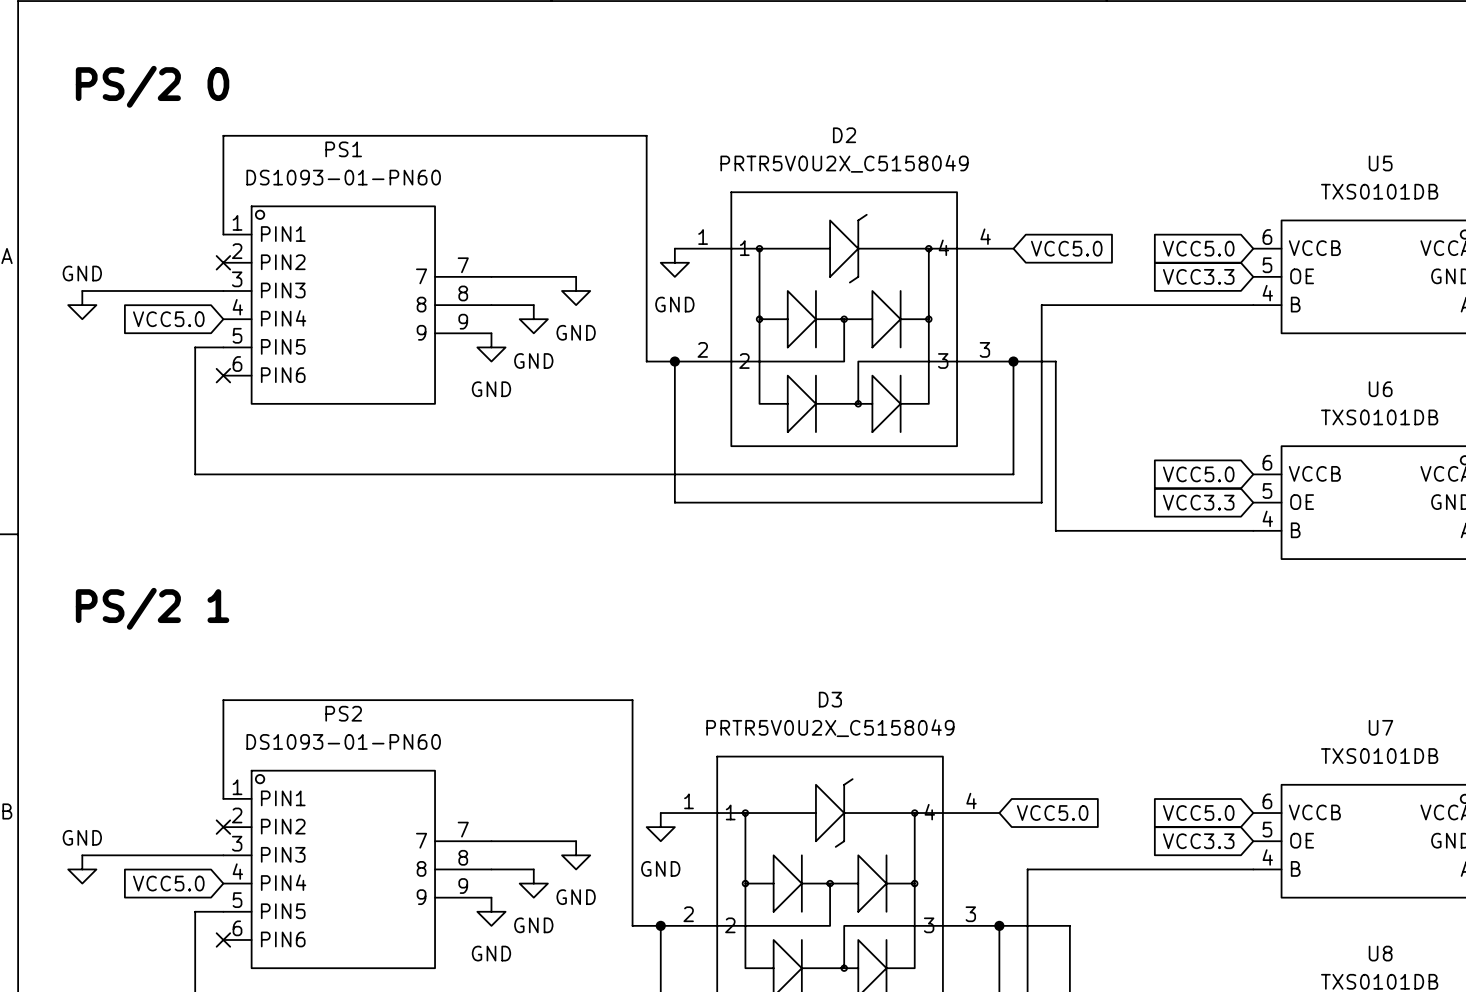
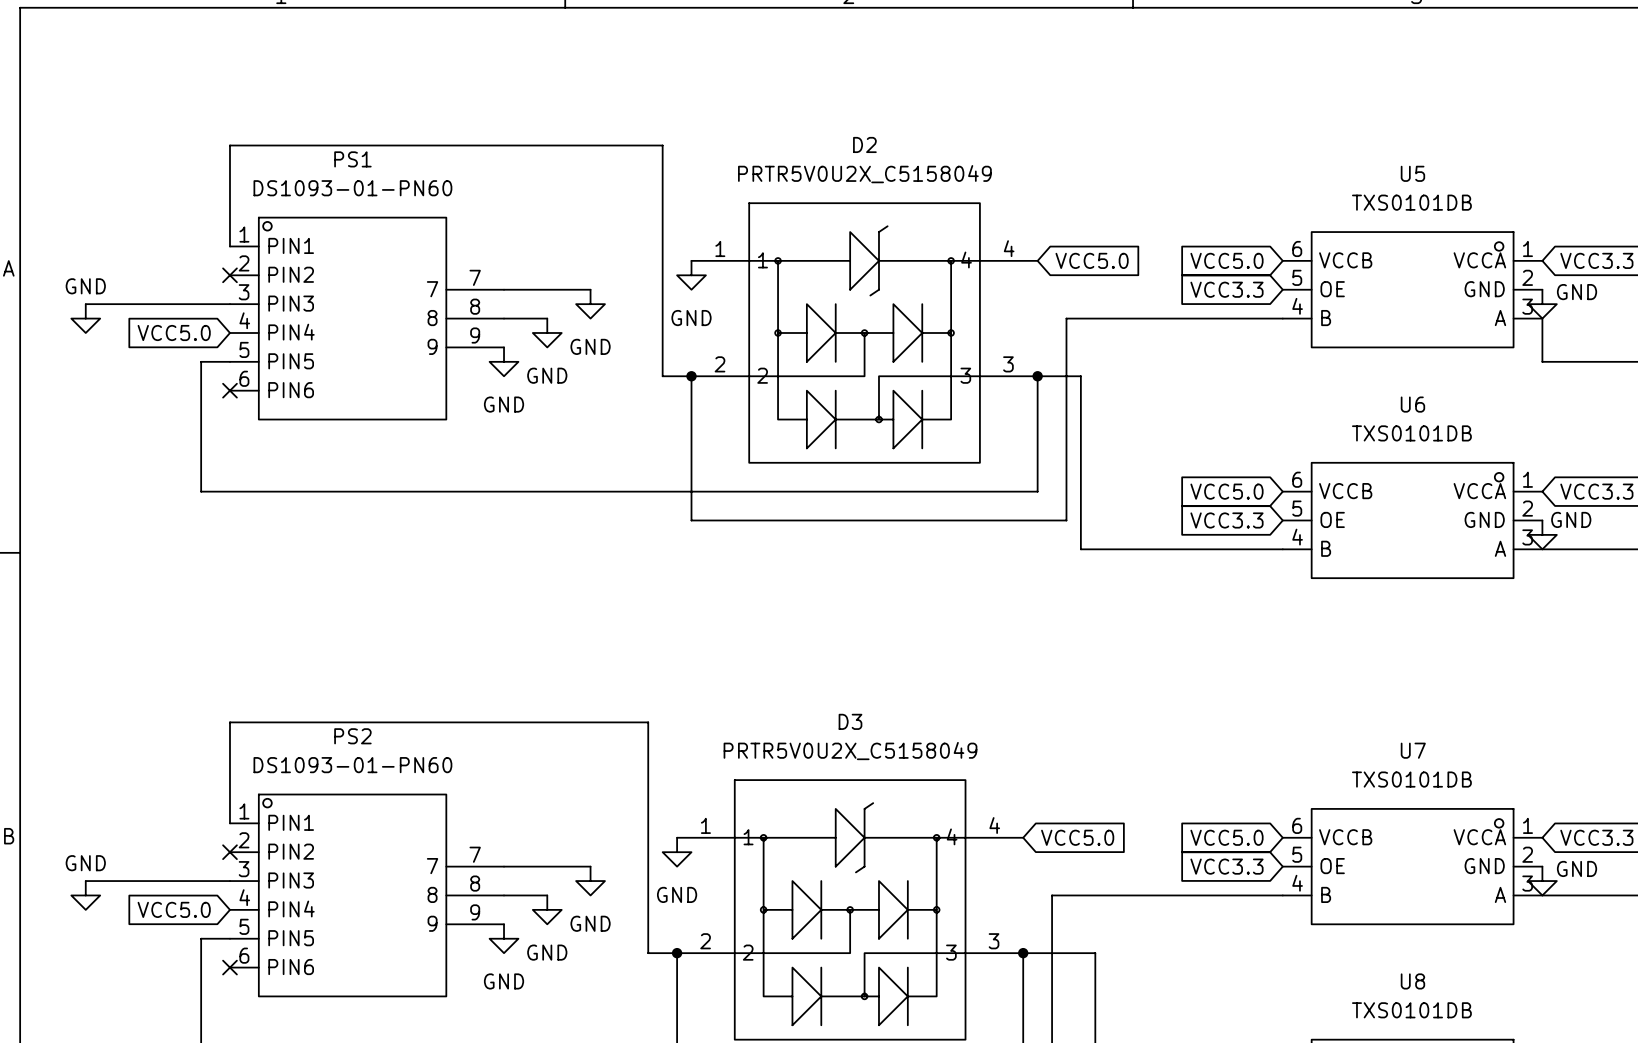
label: PS/2 0 (152, 86) -> none
label: PS/2 1 (152, 608) -> none

